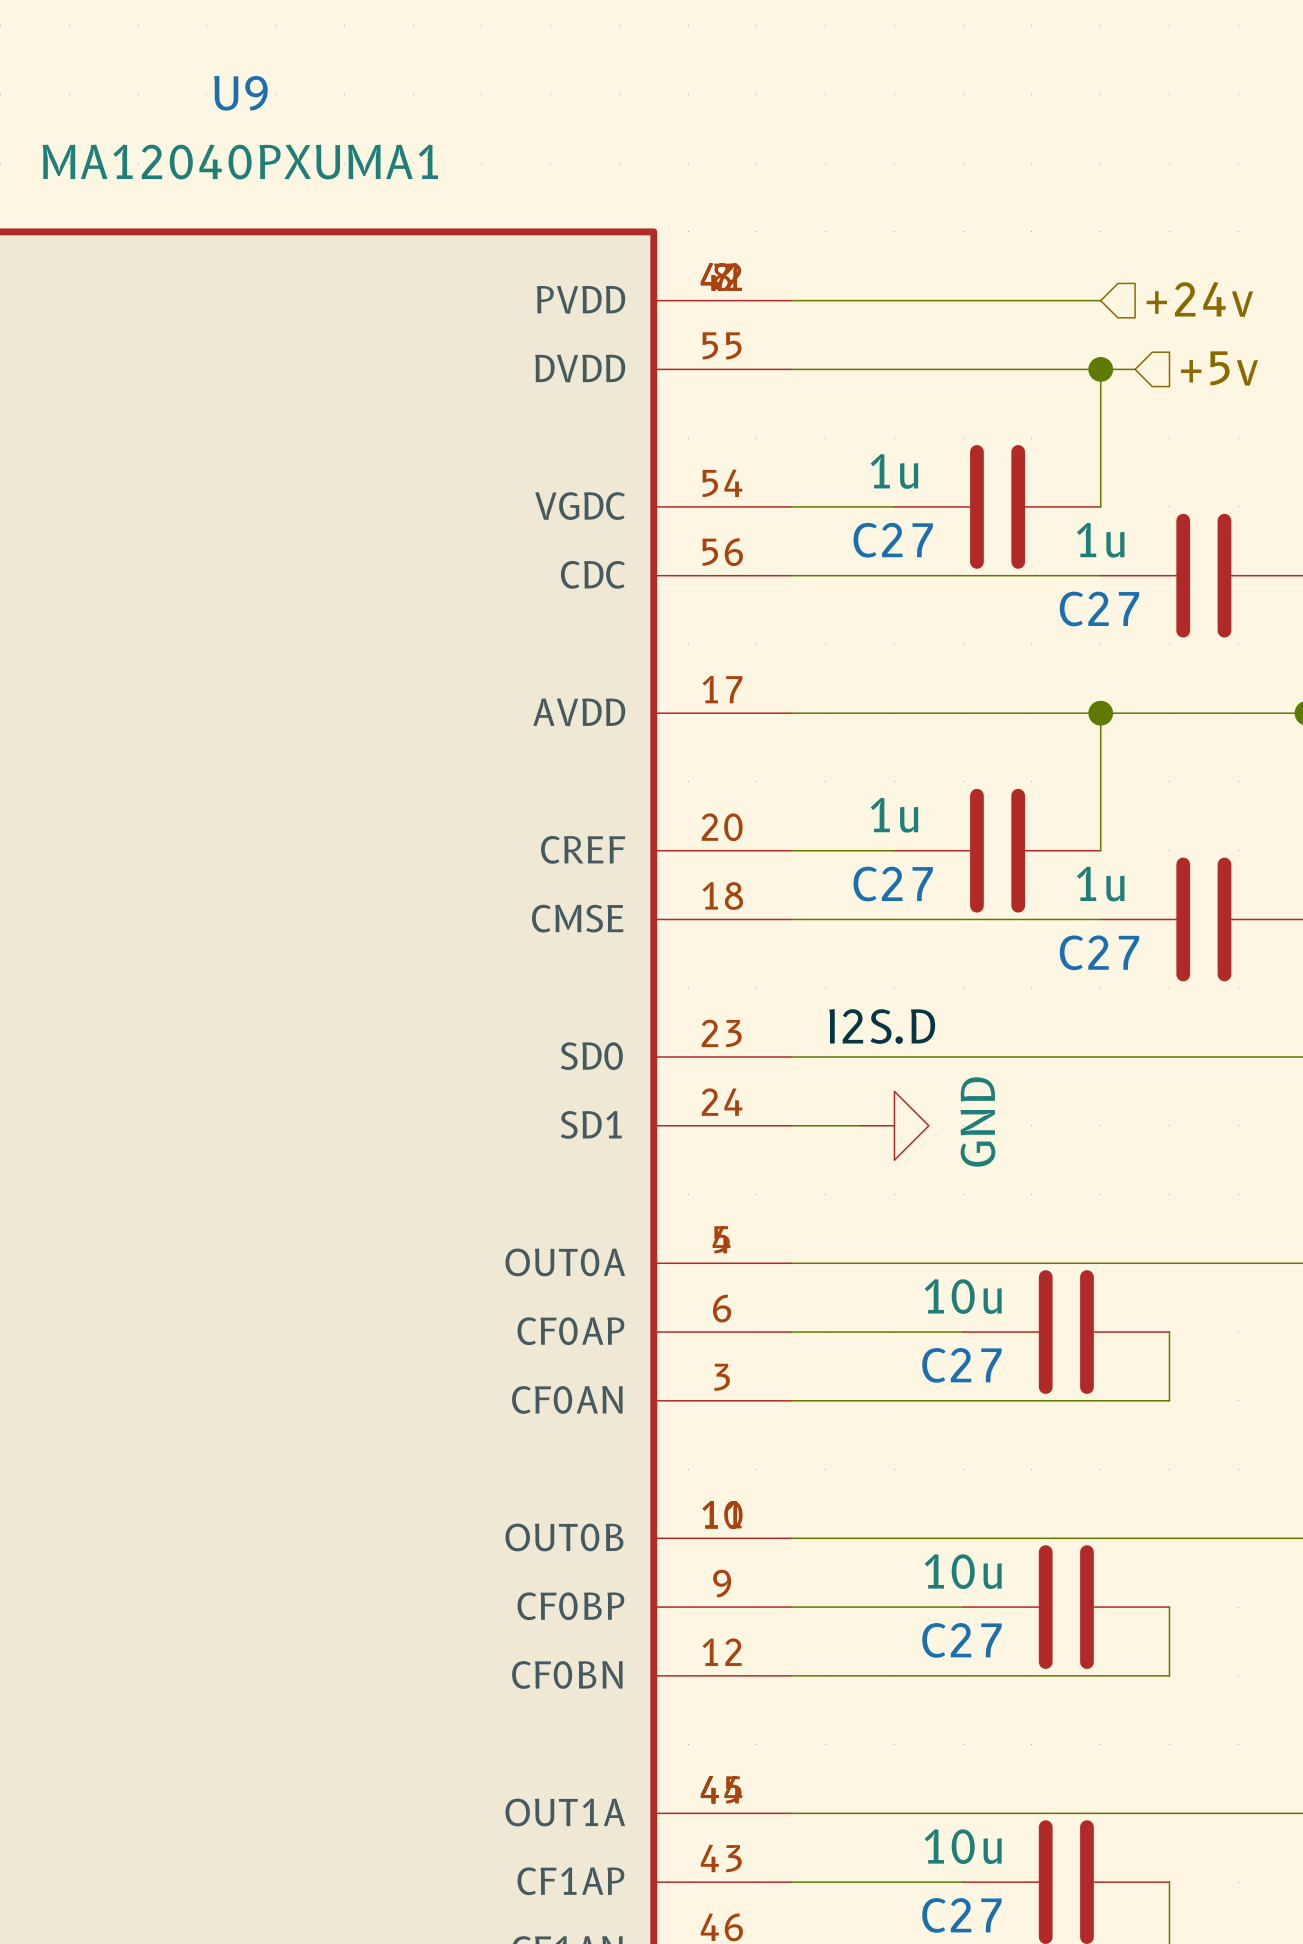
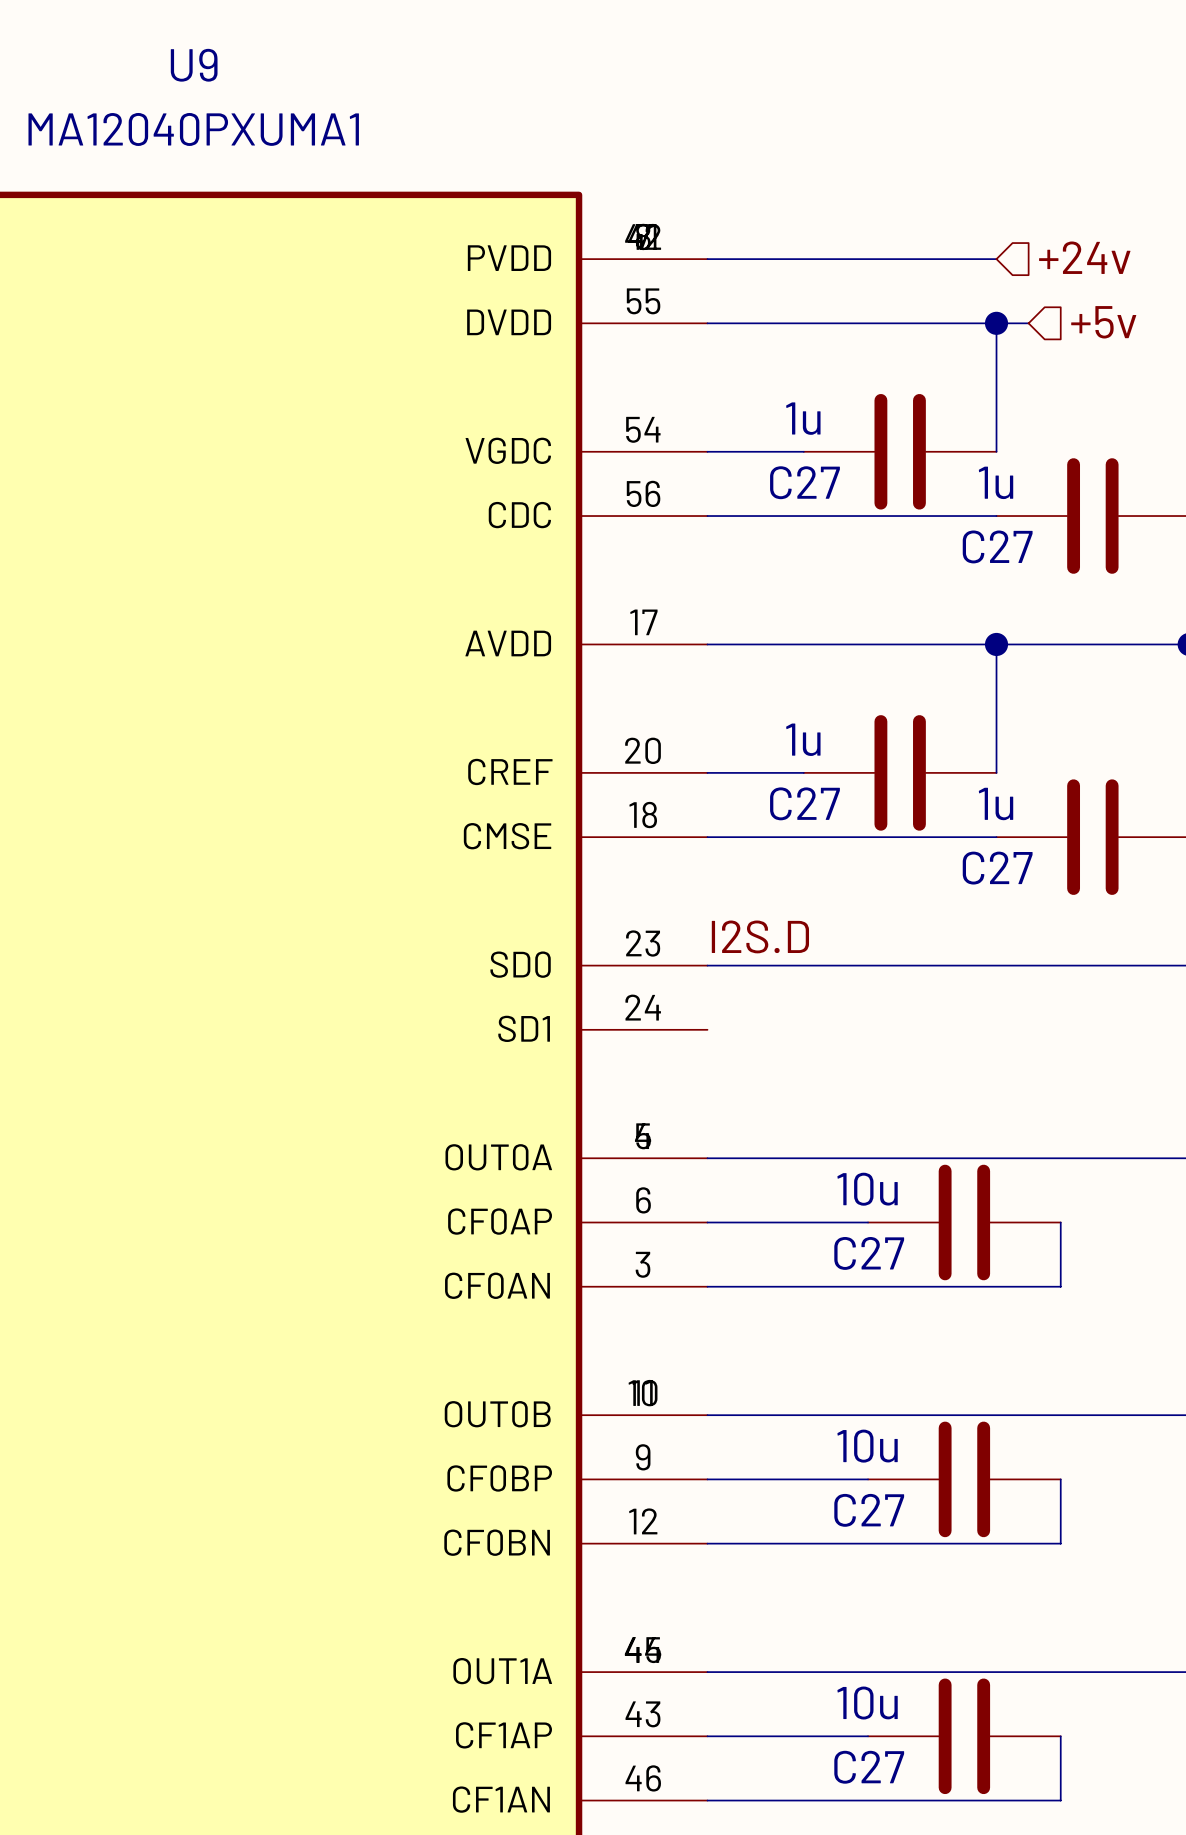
label position: I2S.D (882, 1026) -> I2S.D (760, 936)
wire: (791, 1125) (860, 1125) -> none
power symbol: GND (894, 1125) -> none

